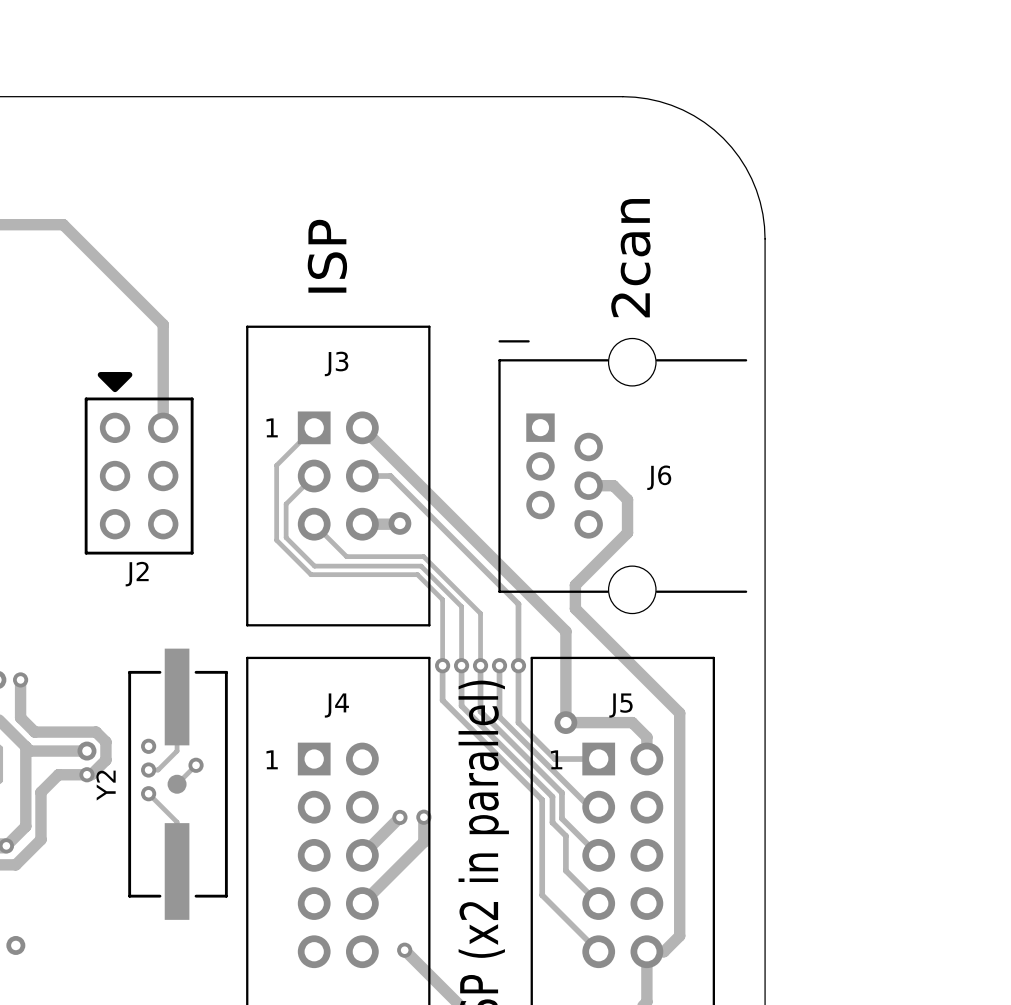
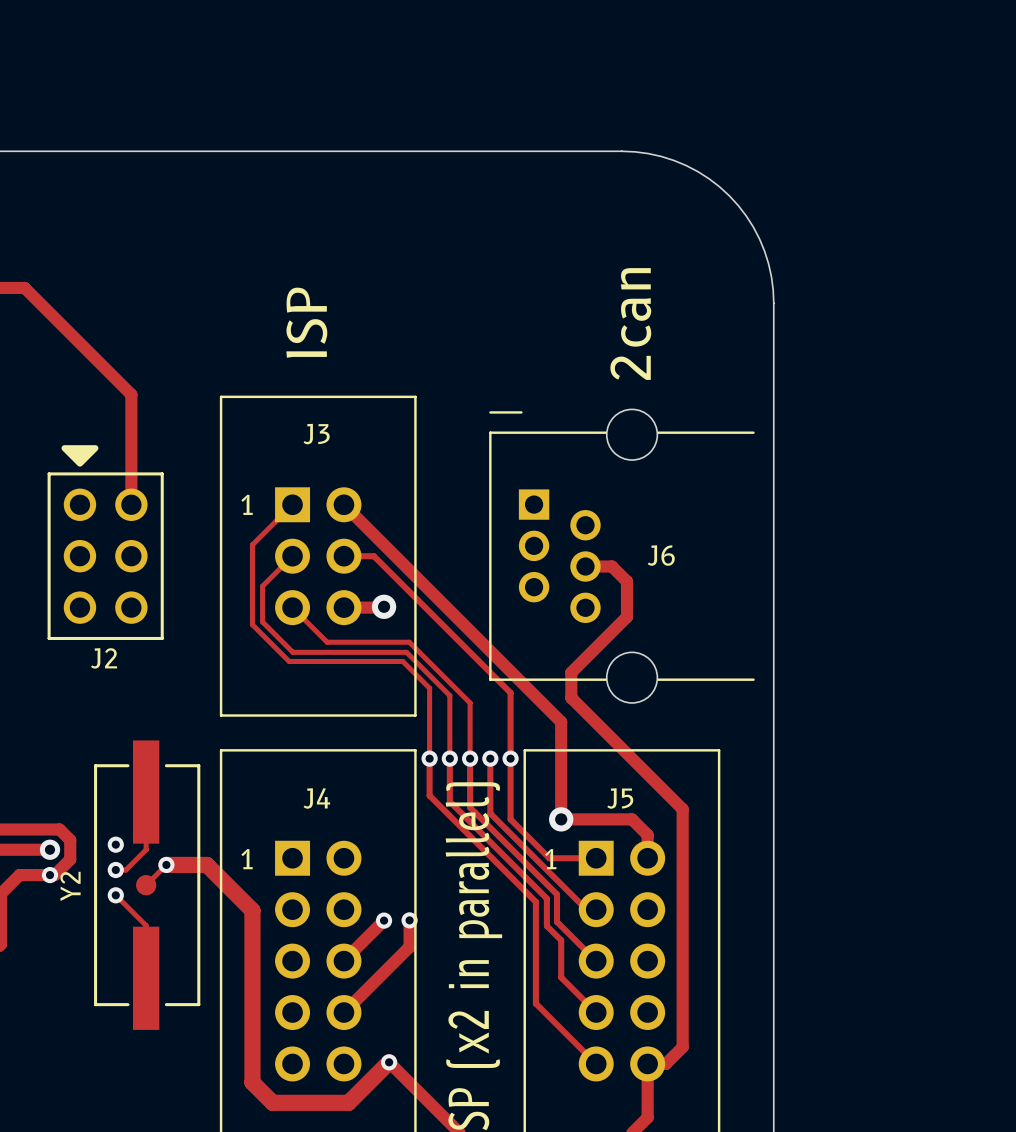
track: none -> (166, 864) (206, 864) (252, 910) (252, 1082) (272, 1102) (348, 1102) (389, 1062)

